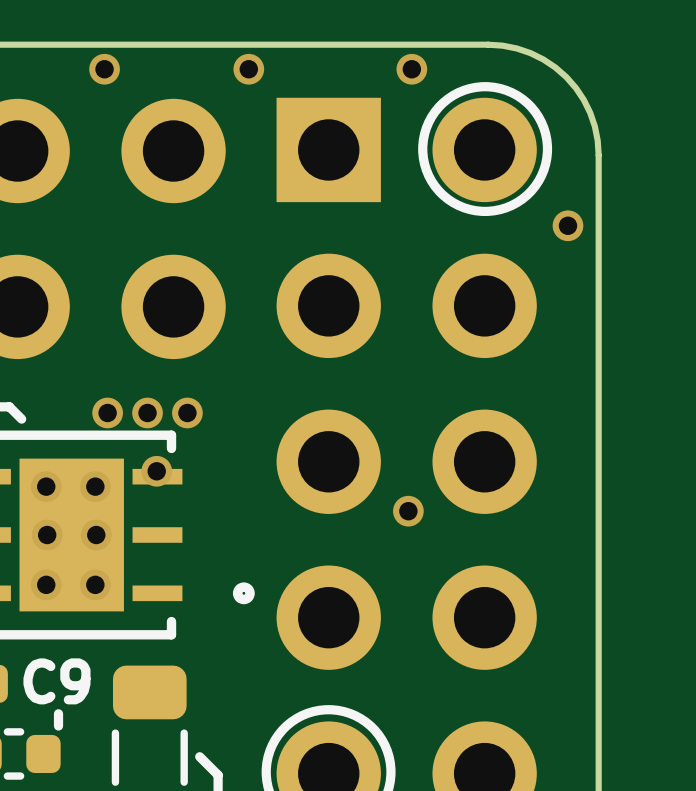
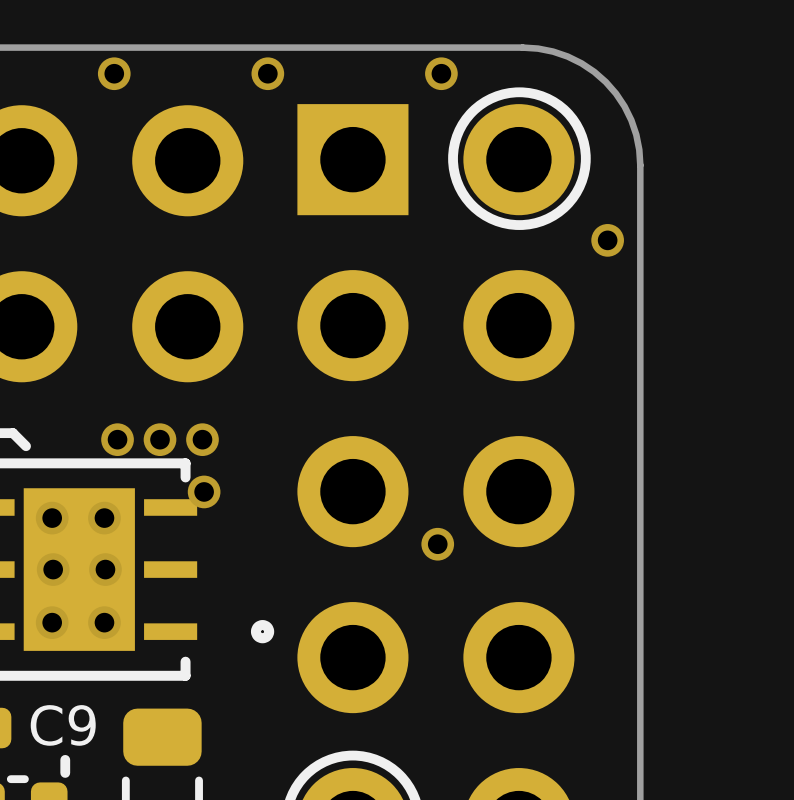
via position: (156, 471) -> (204, 491)

